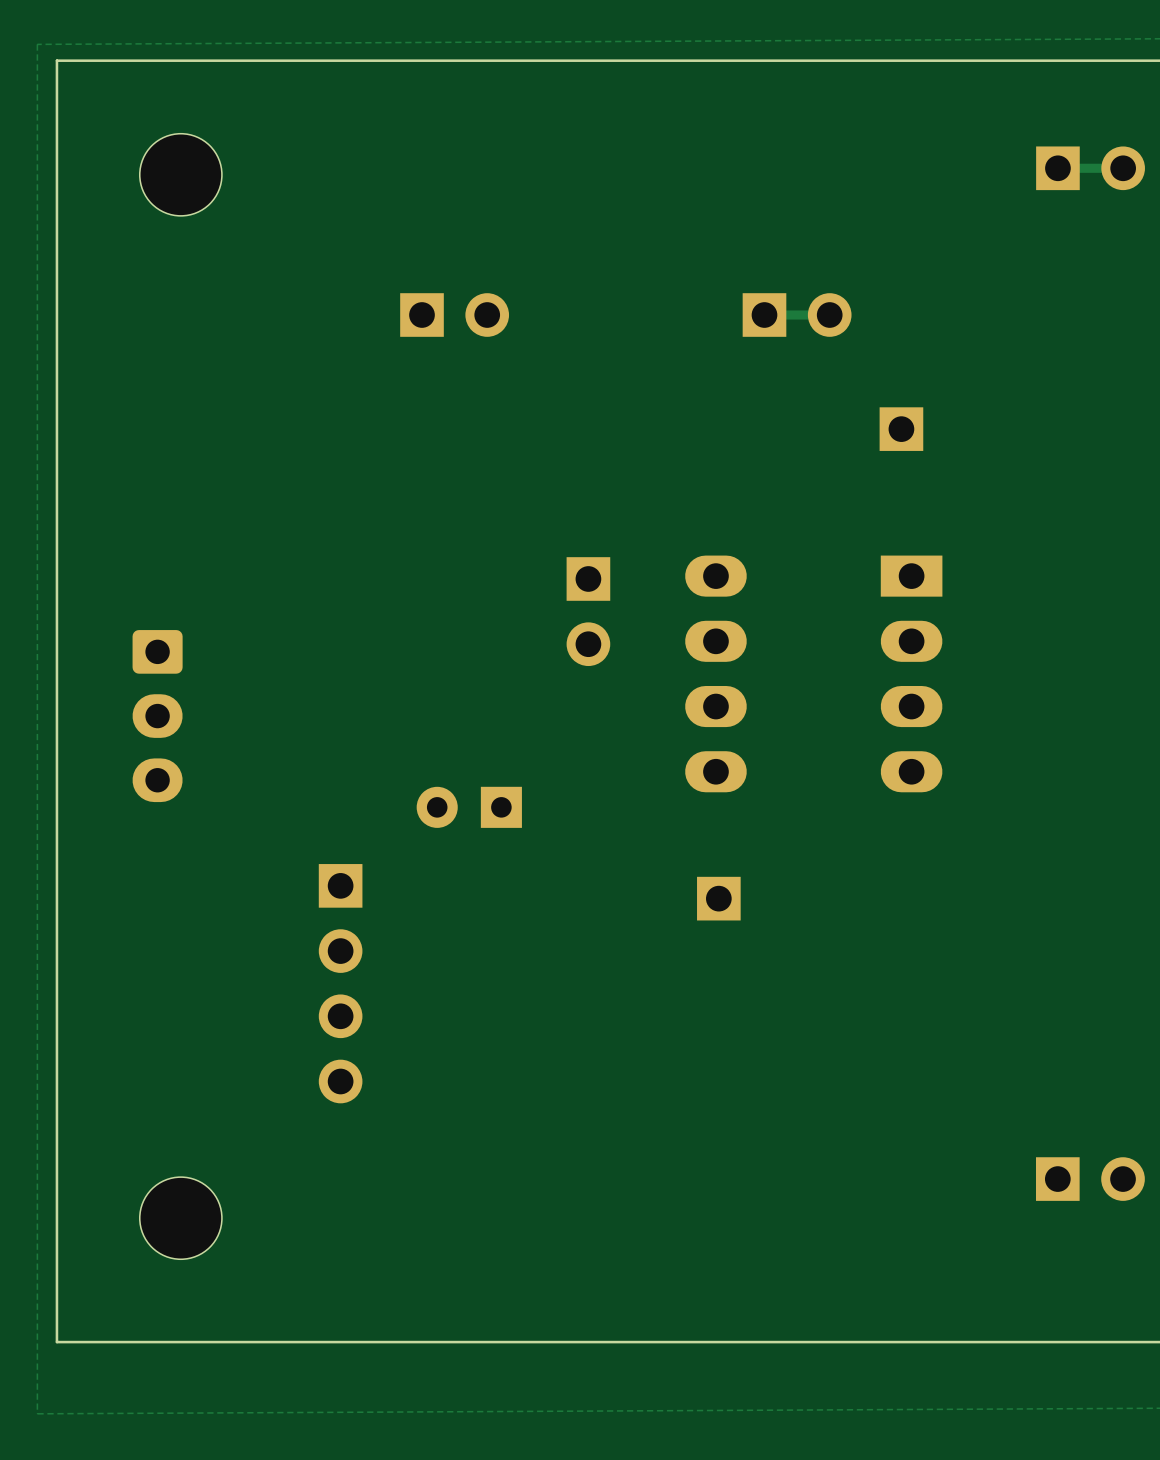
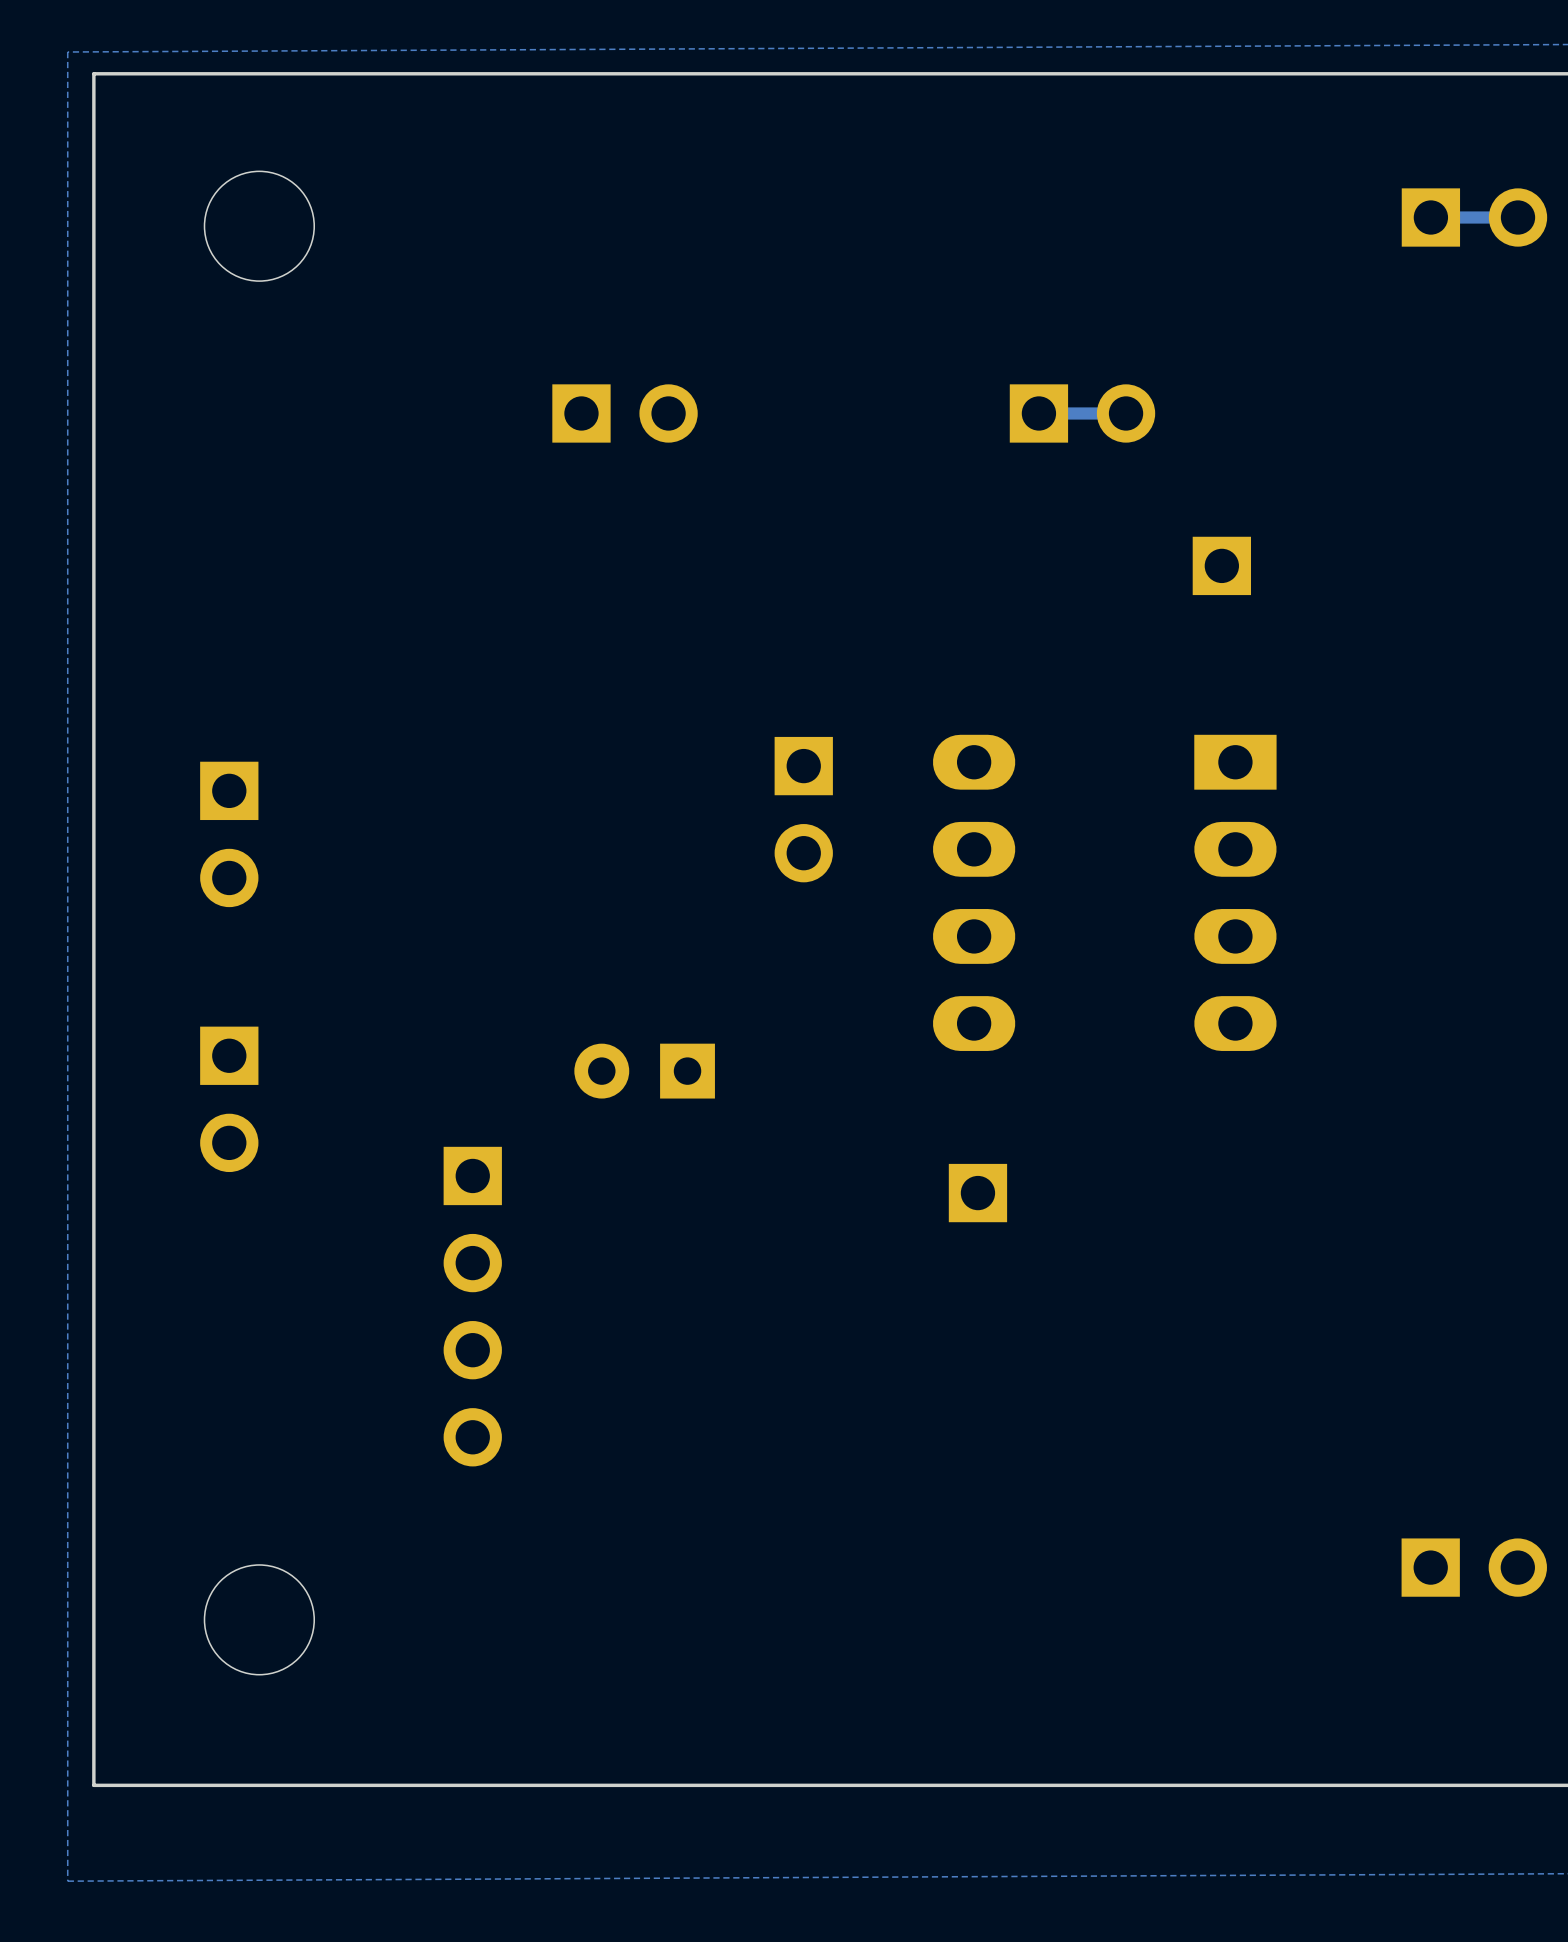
part: none -> (229, 834)
part: (157, 716) -> none
part: none -> (229, 1099)

